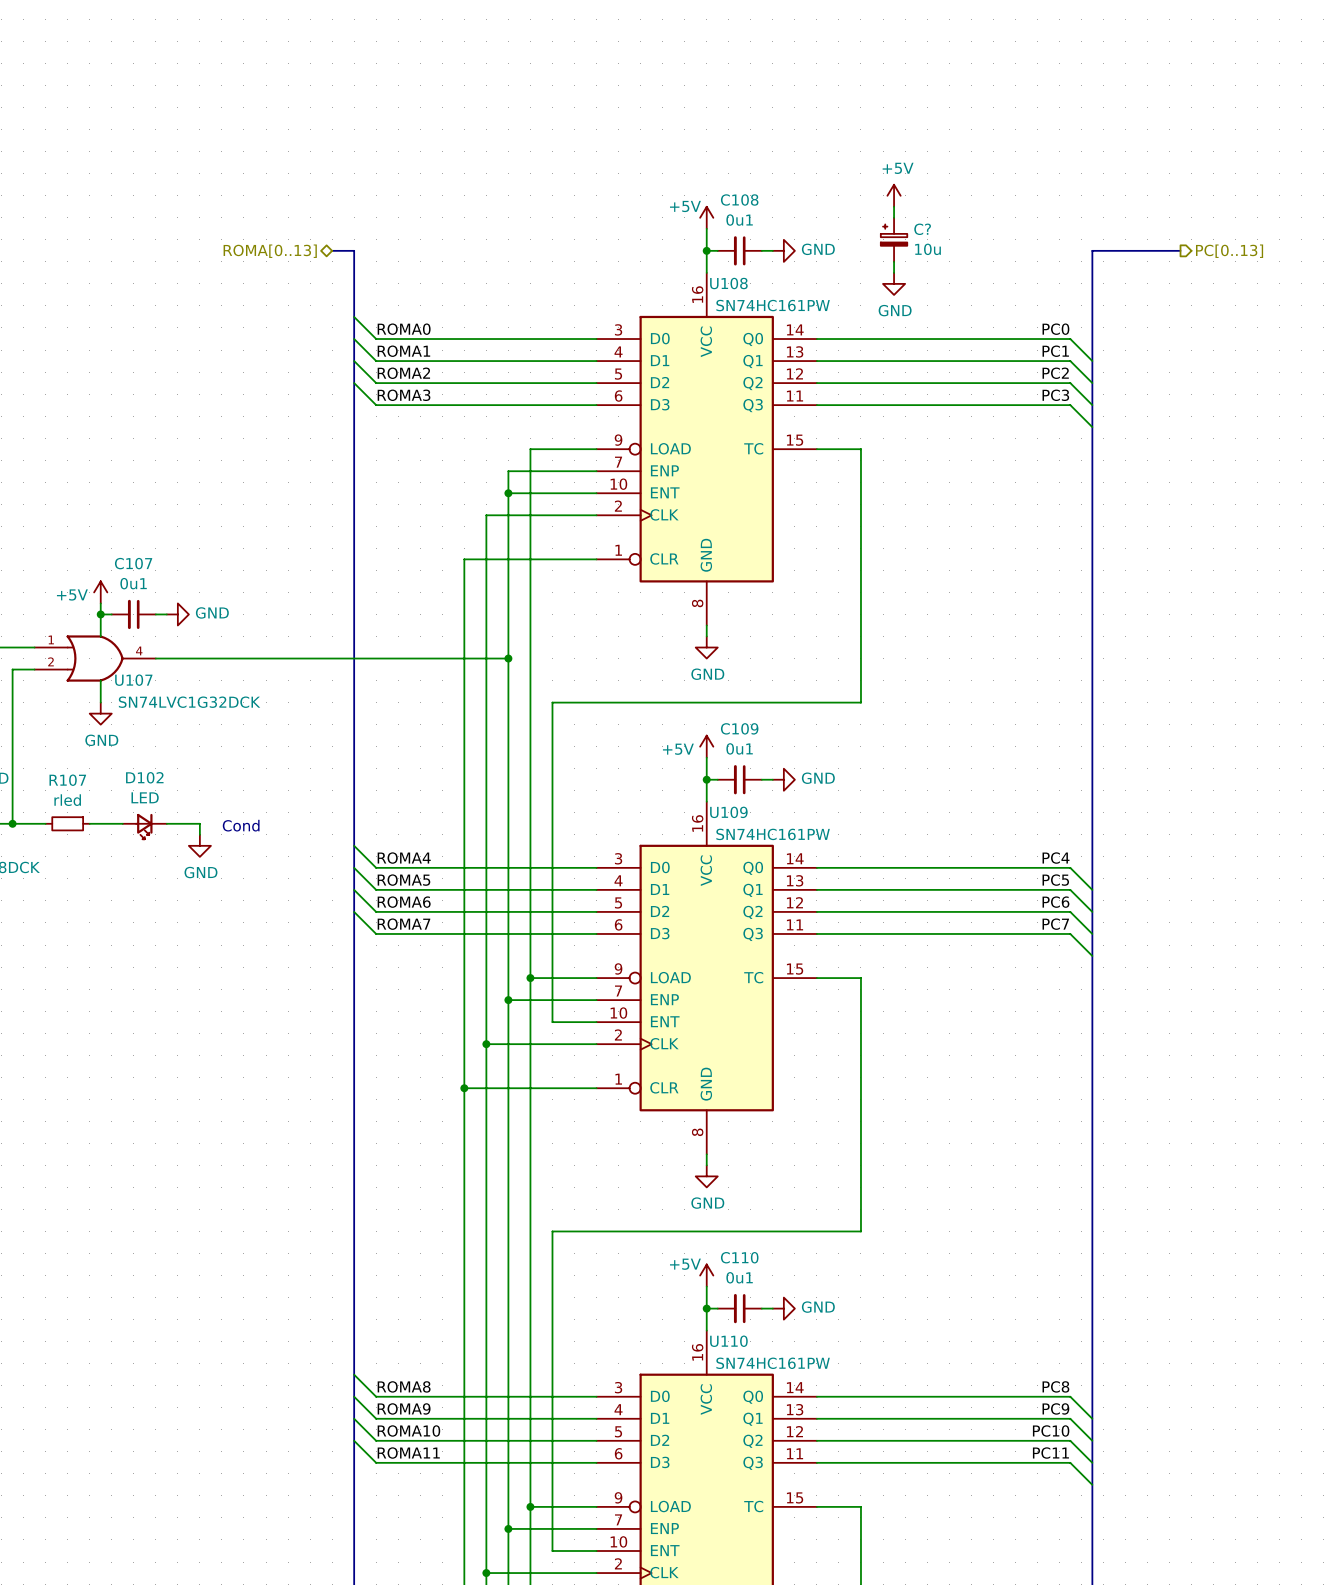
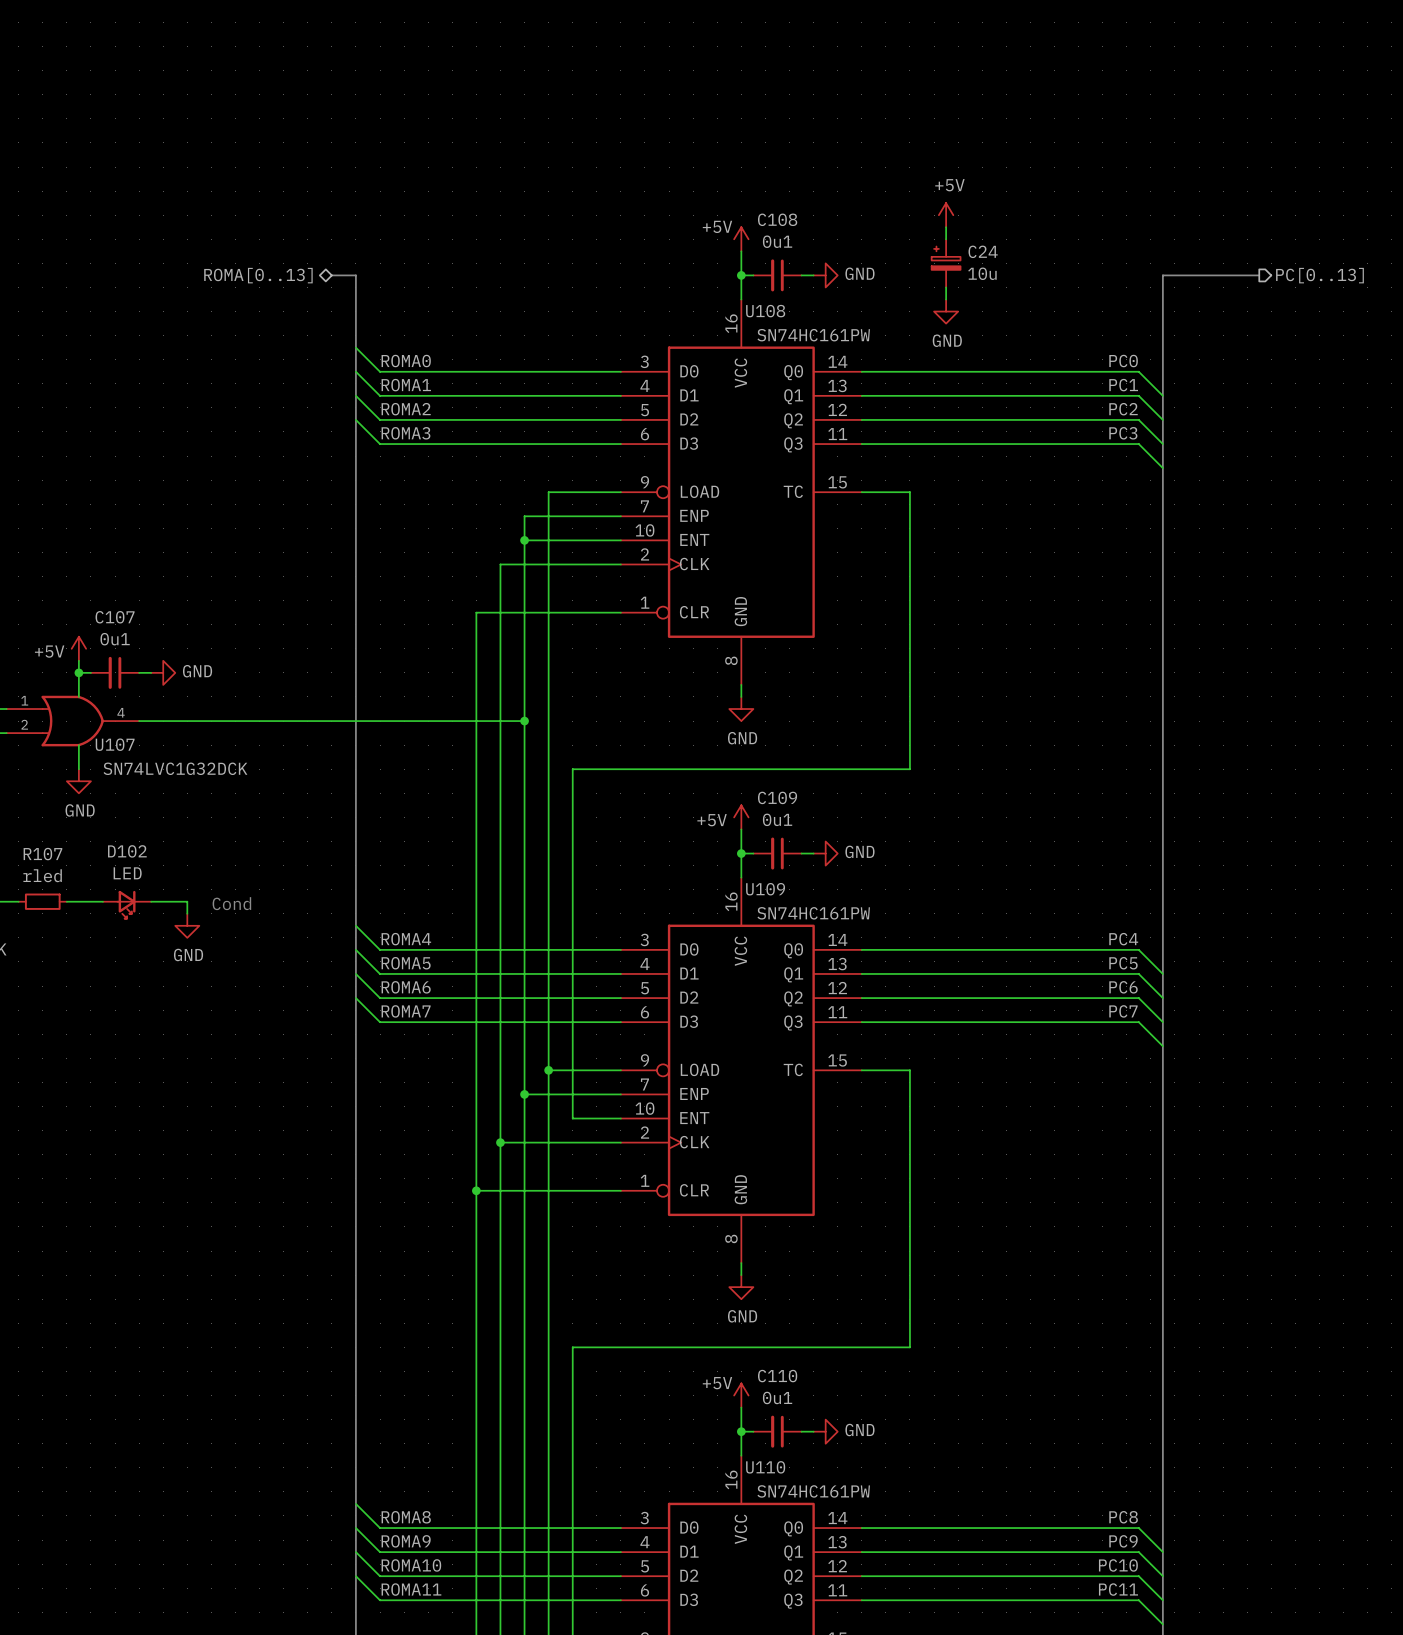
C? name: C? (922, 229) -> C24 (983, 251)

